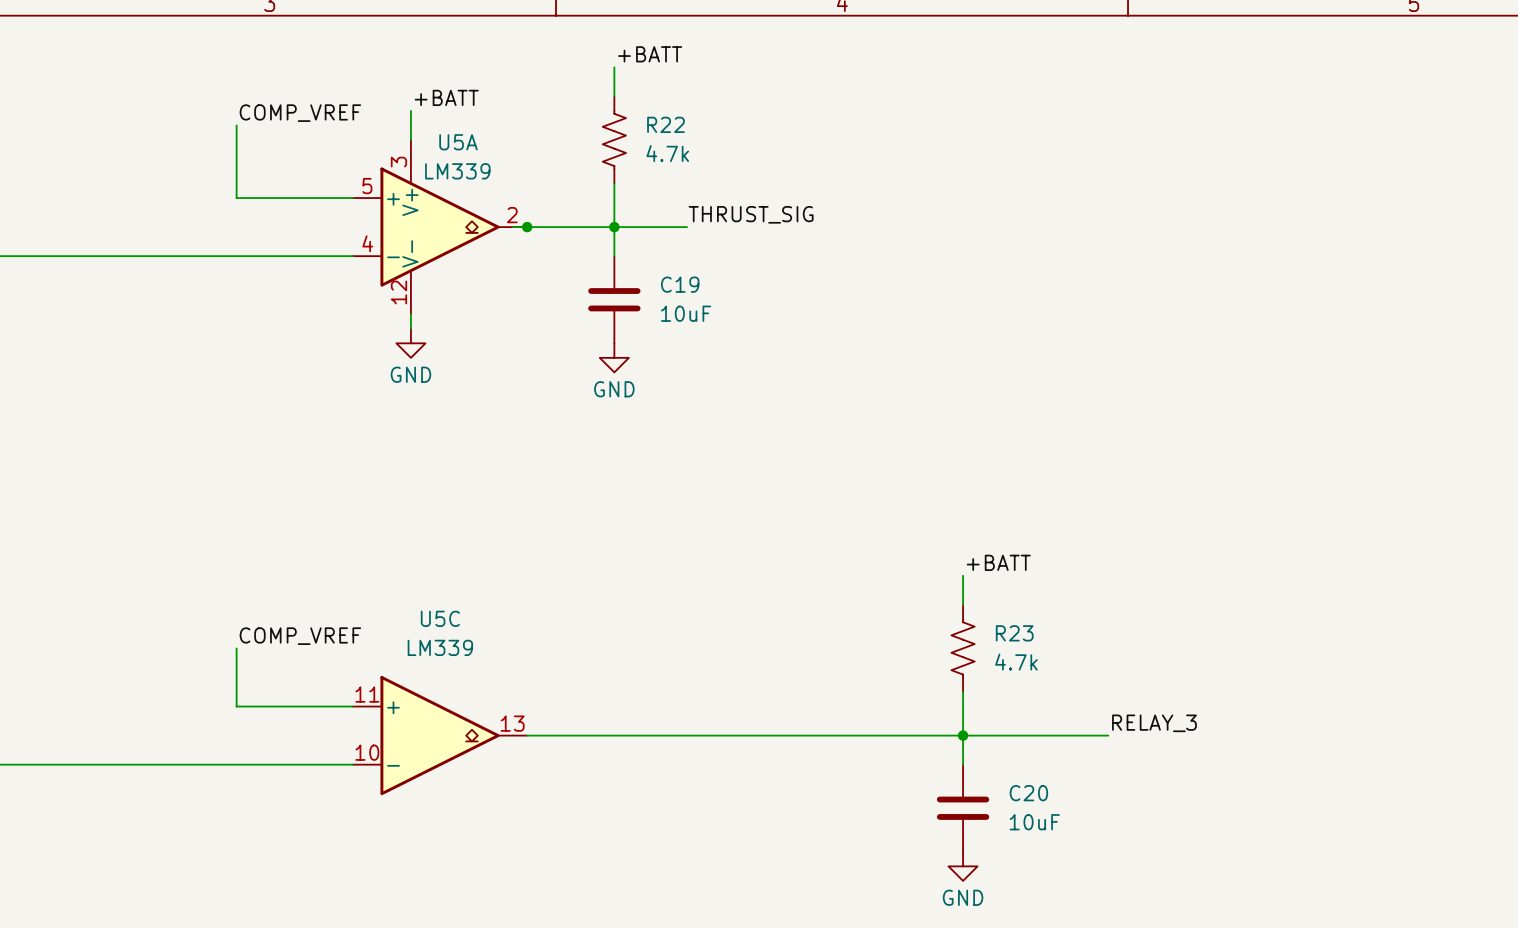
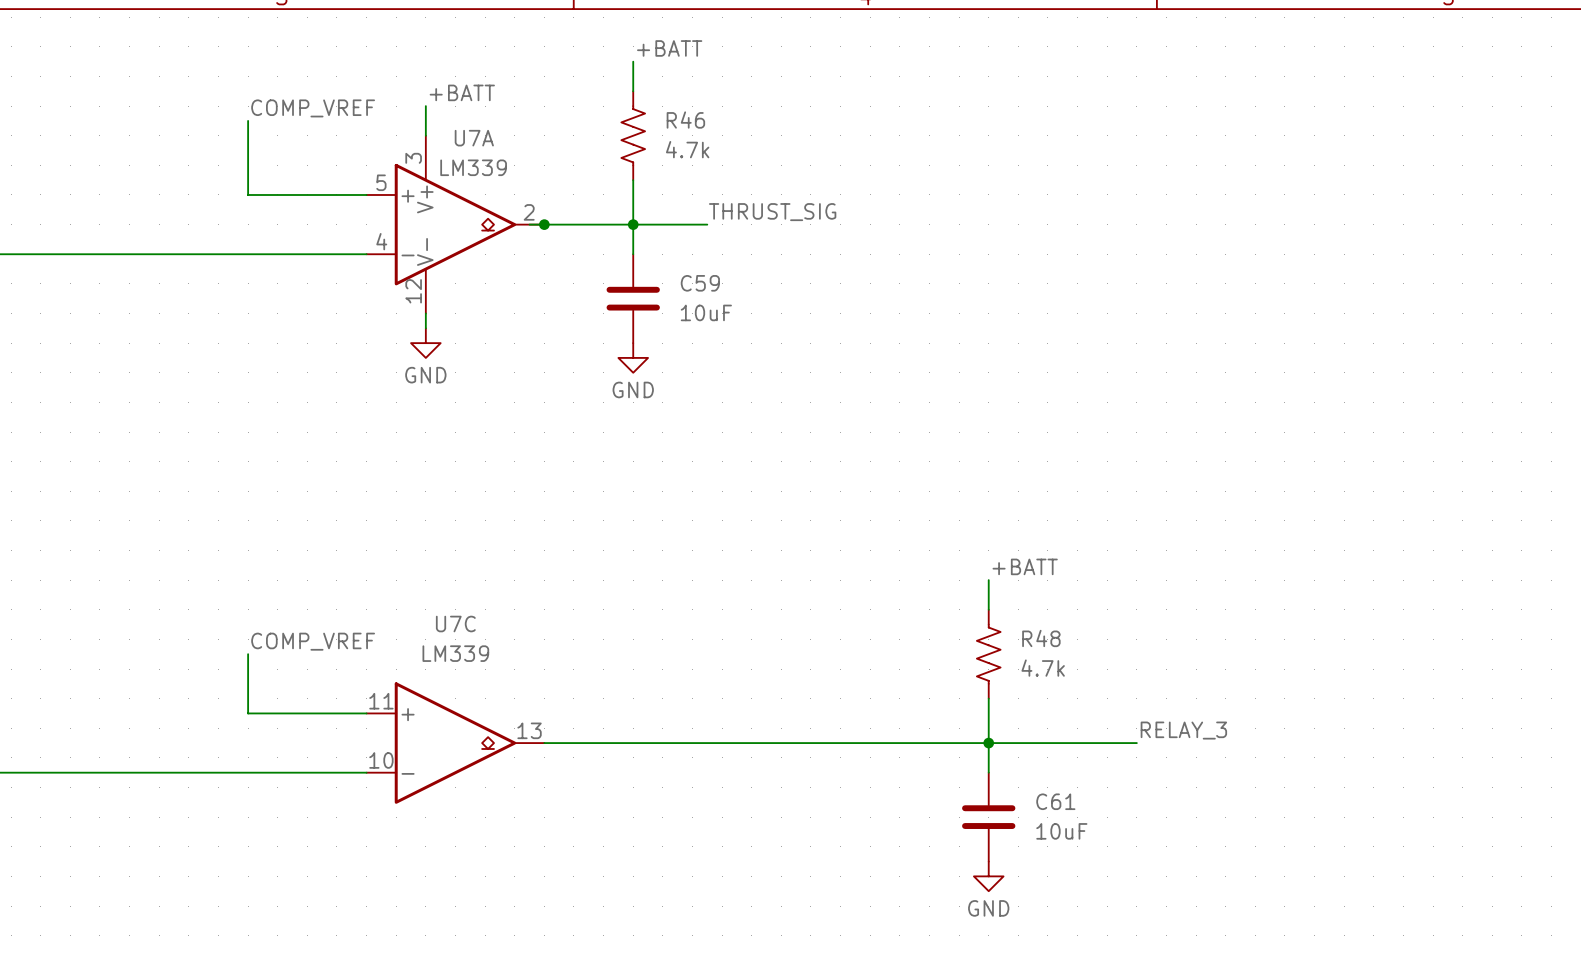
R22 name: R22 (666, 124) -> R46 (685, 120)
U5A name: U5A (458, 142) -> U7A (474, 138)
C19 name: C19 (680, 284) -> C59 (700, 283)
U5C name: U5C (440, 618) -> U7C (455, 624)
R23 name: R23 (1014, 633) -> R48 (1041, 638)
C20 name: C20 (1028, 793) -> C61 (1055, 801)

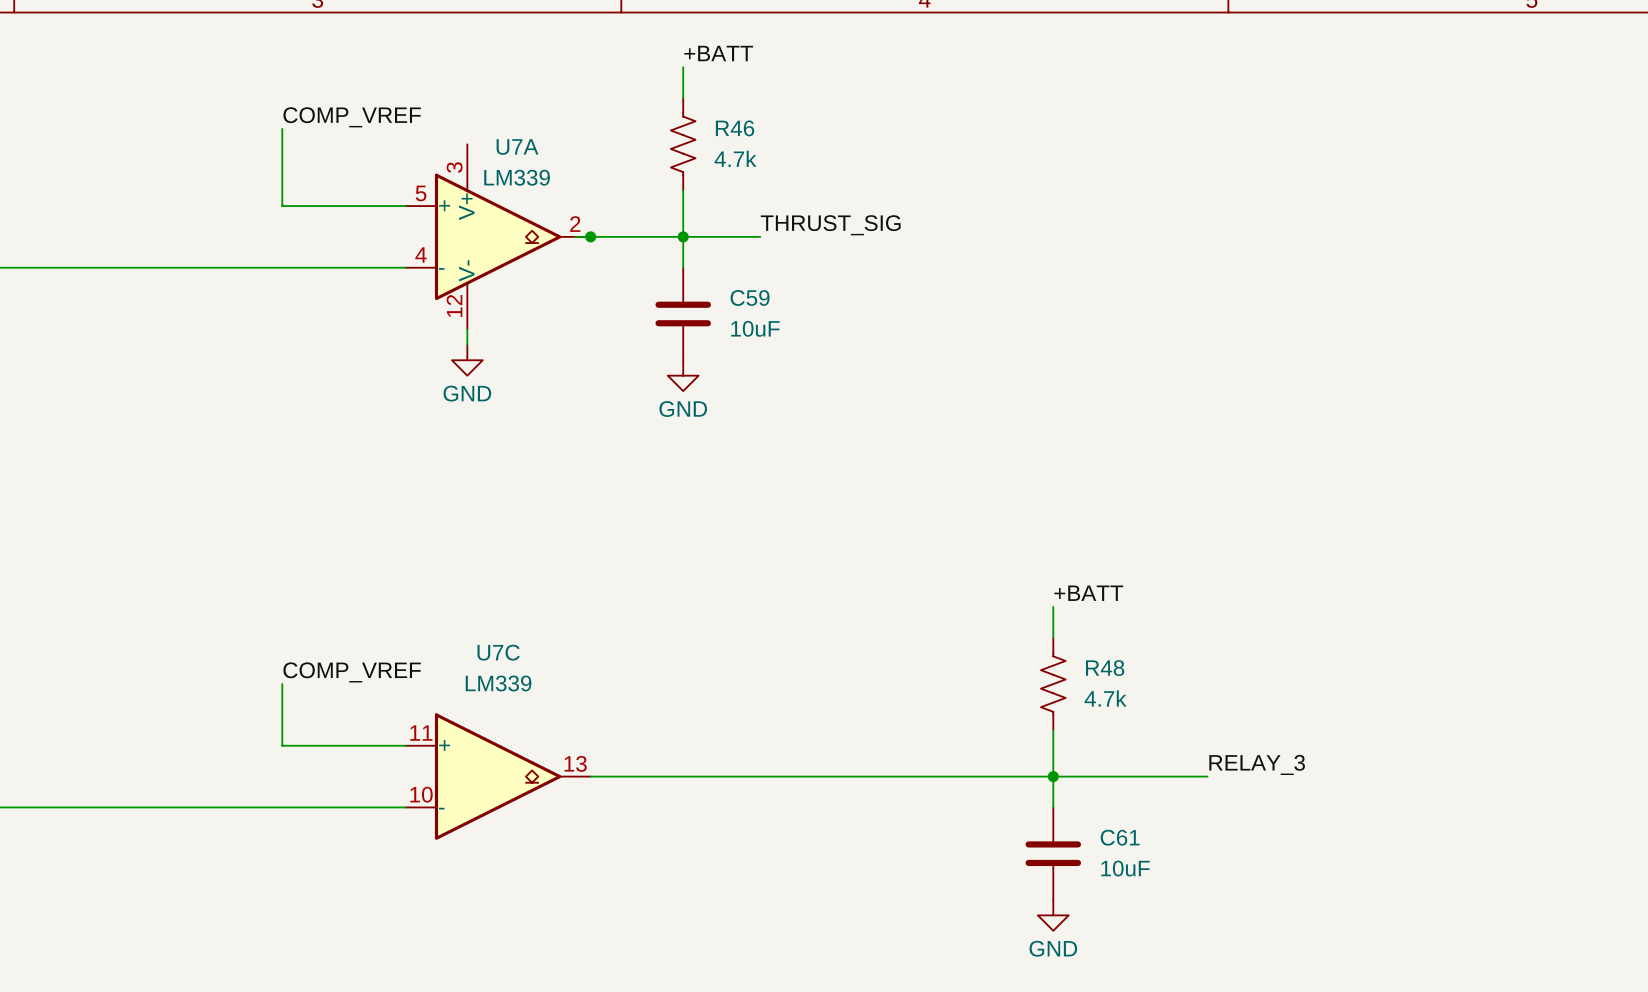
label: +BATT (462, 92) -> none
wire: (425, 106) (425, 135) -> none

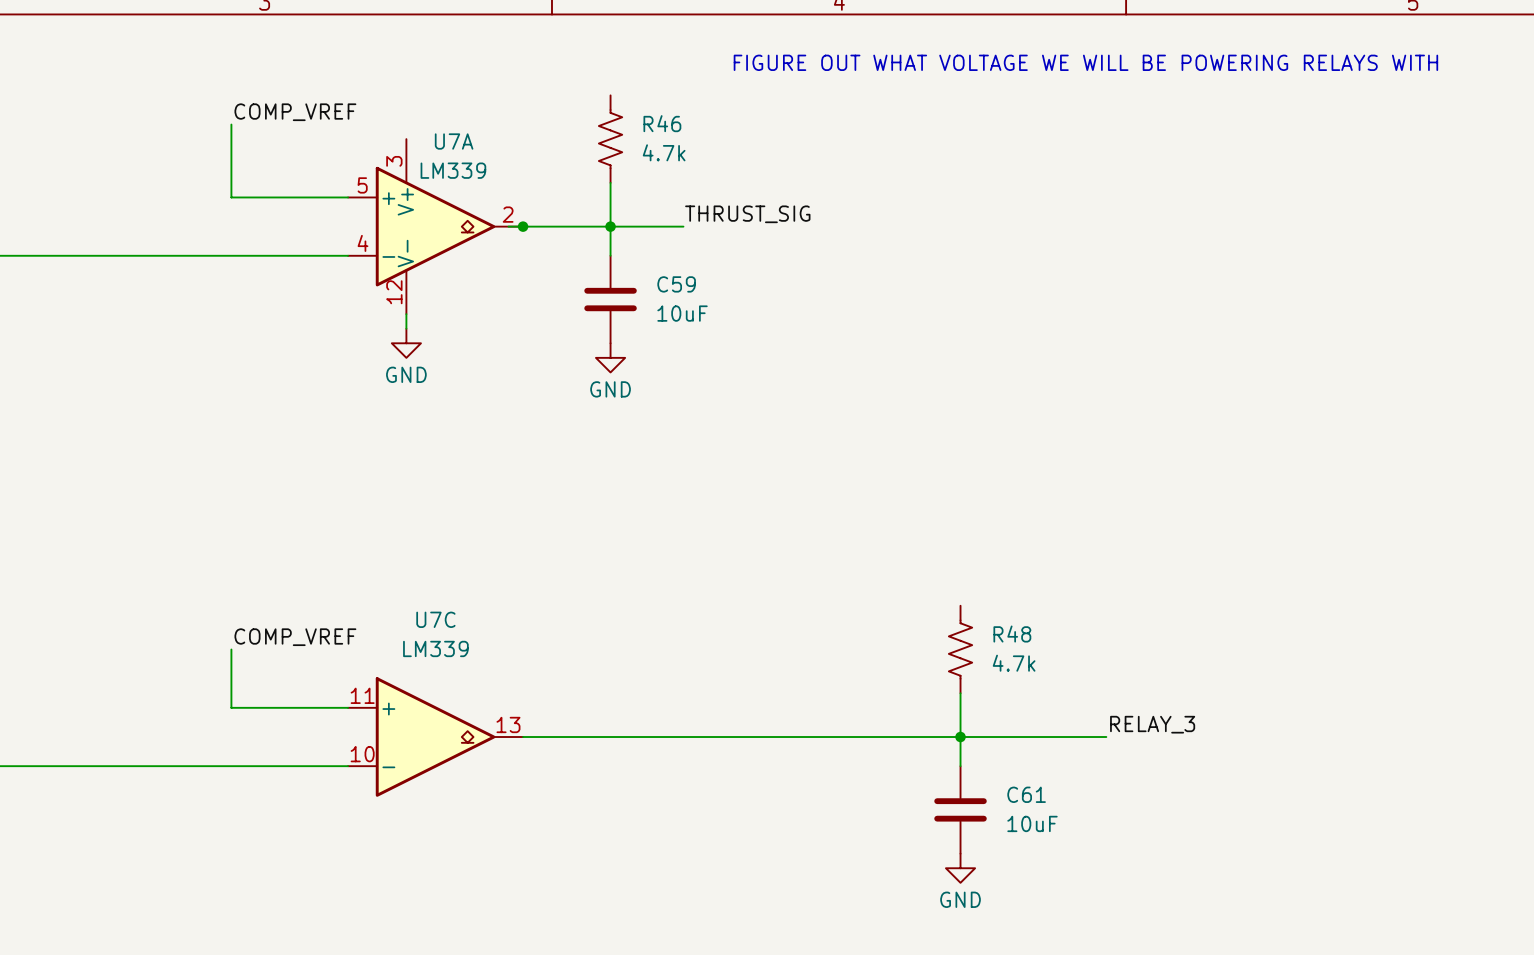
label: +BATT (718, 53) -> none
text: none -> FIGURE OUT WHAT VOLTAGE WE WILL BE POWERING RELAYS WITH (1085, 62)
wire: (683, 67) (683, 98) -> none
label: +BATT (1088, 593) -> none
wire: (1053, 606) (1053, 637) -> none

